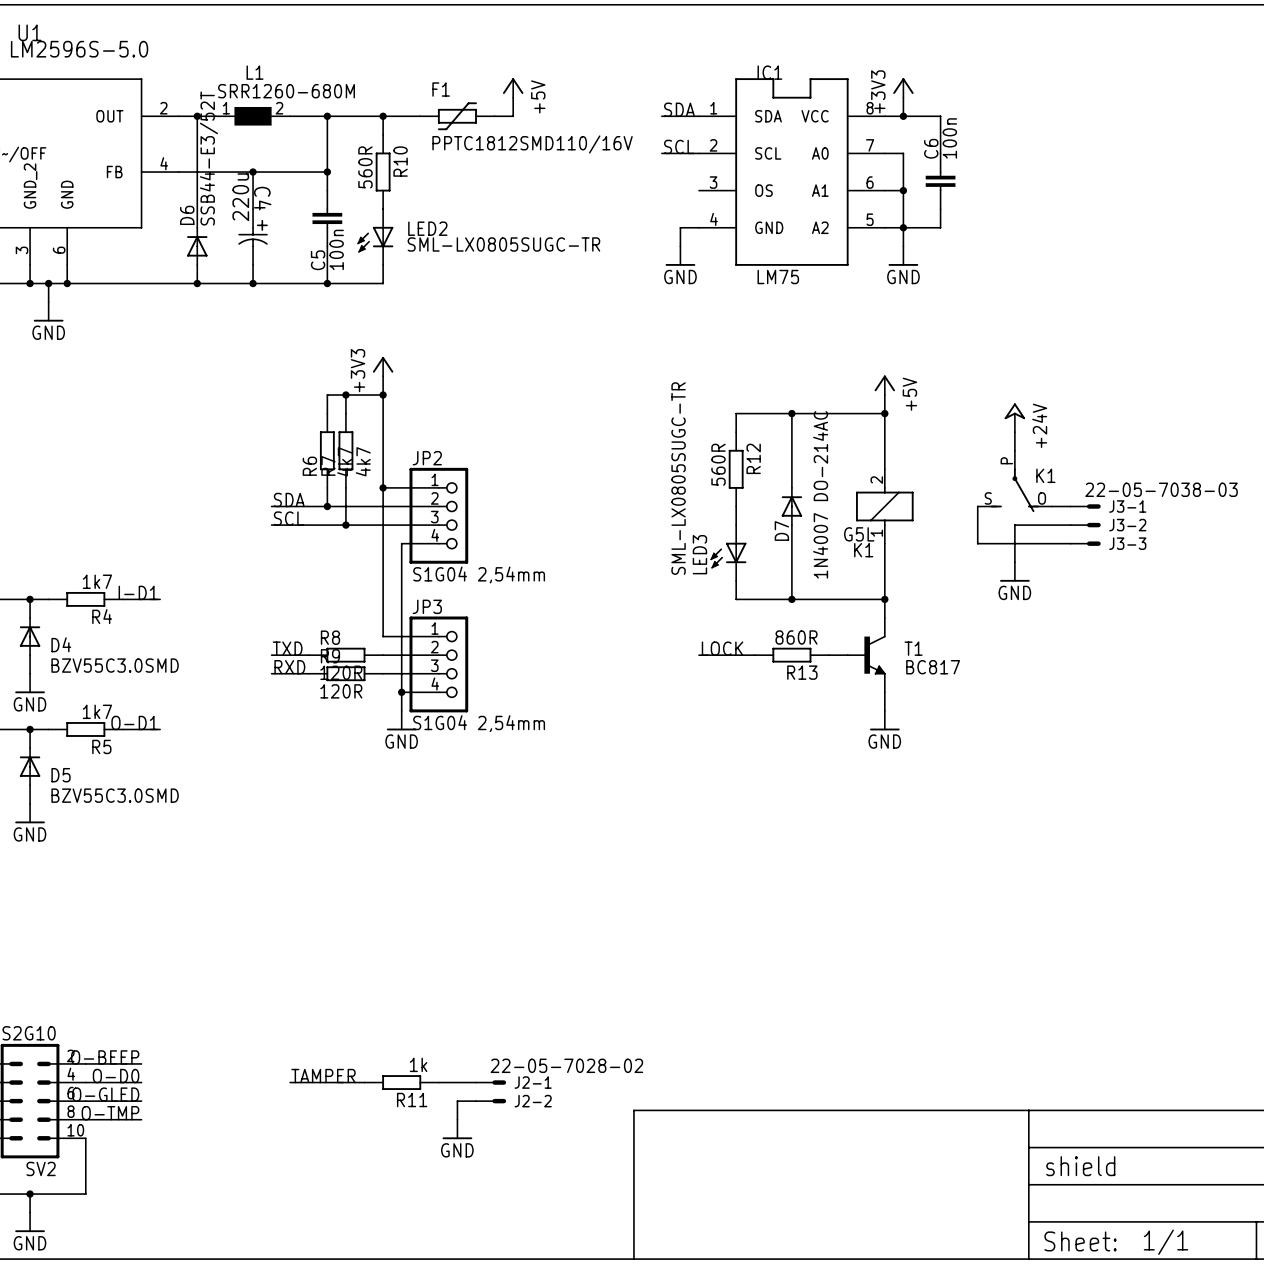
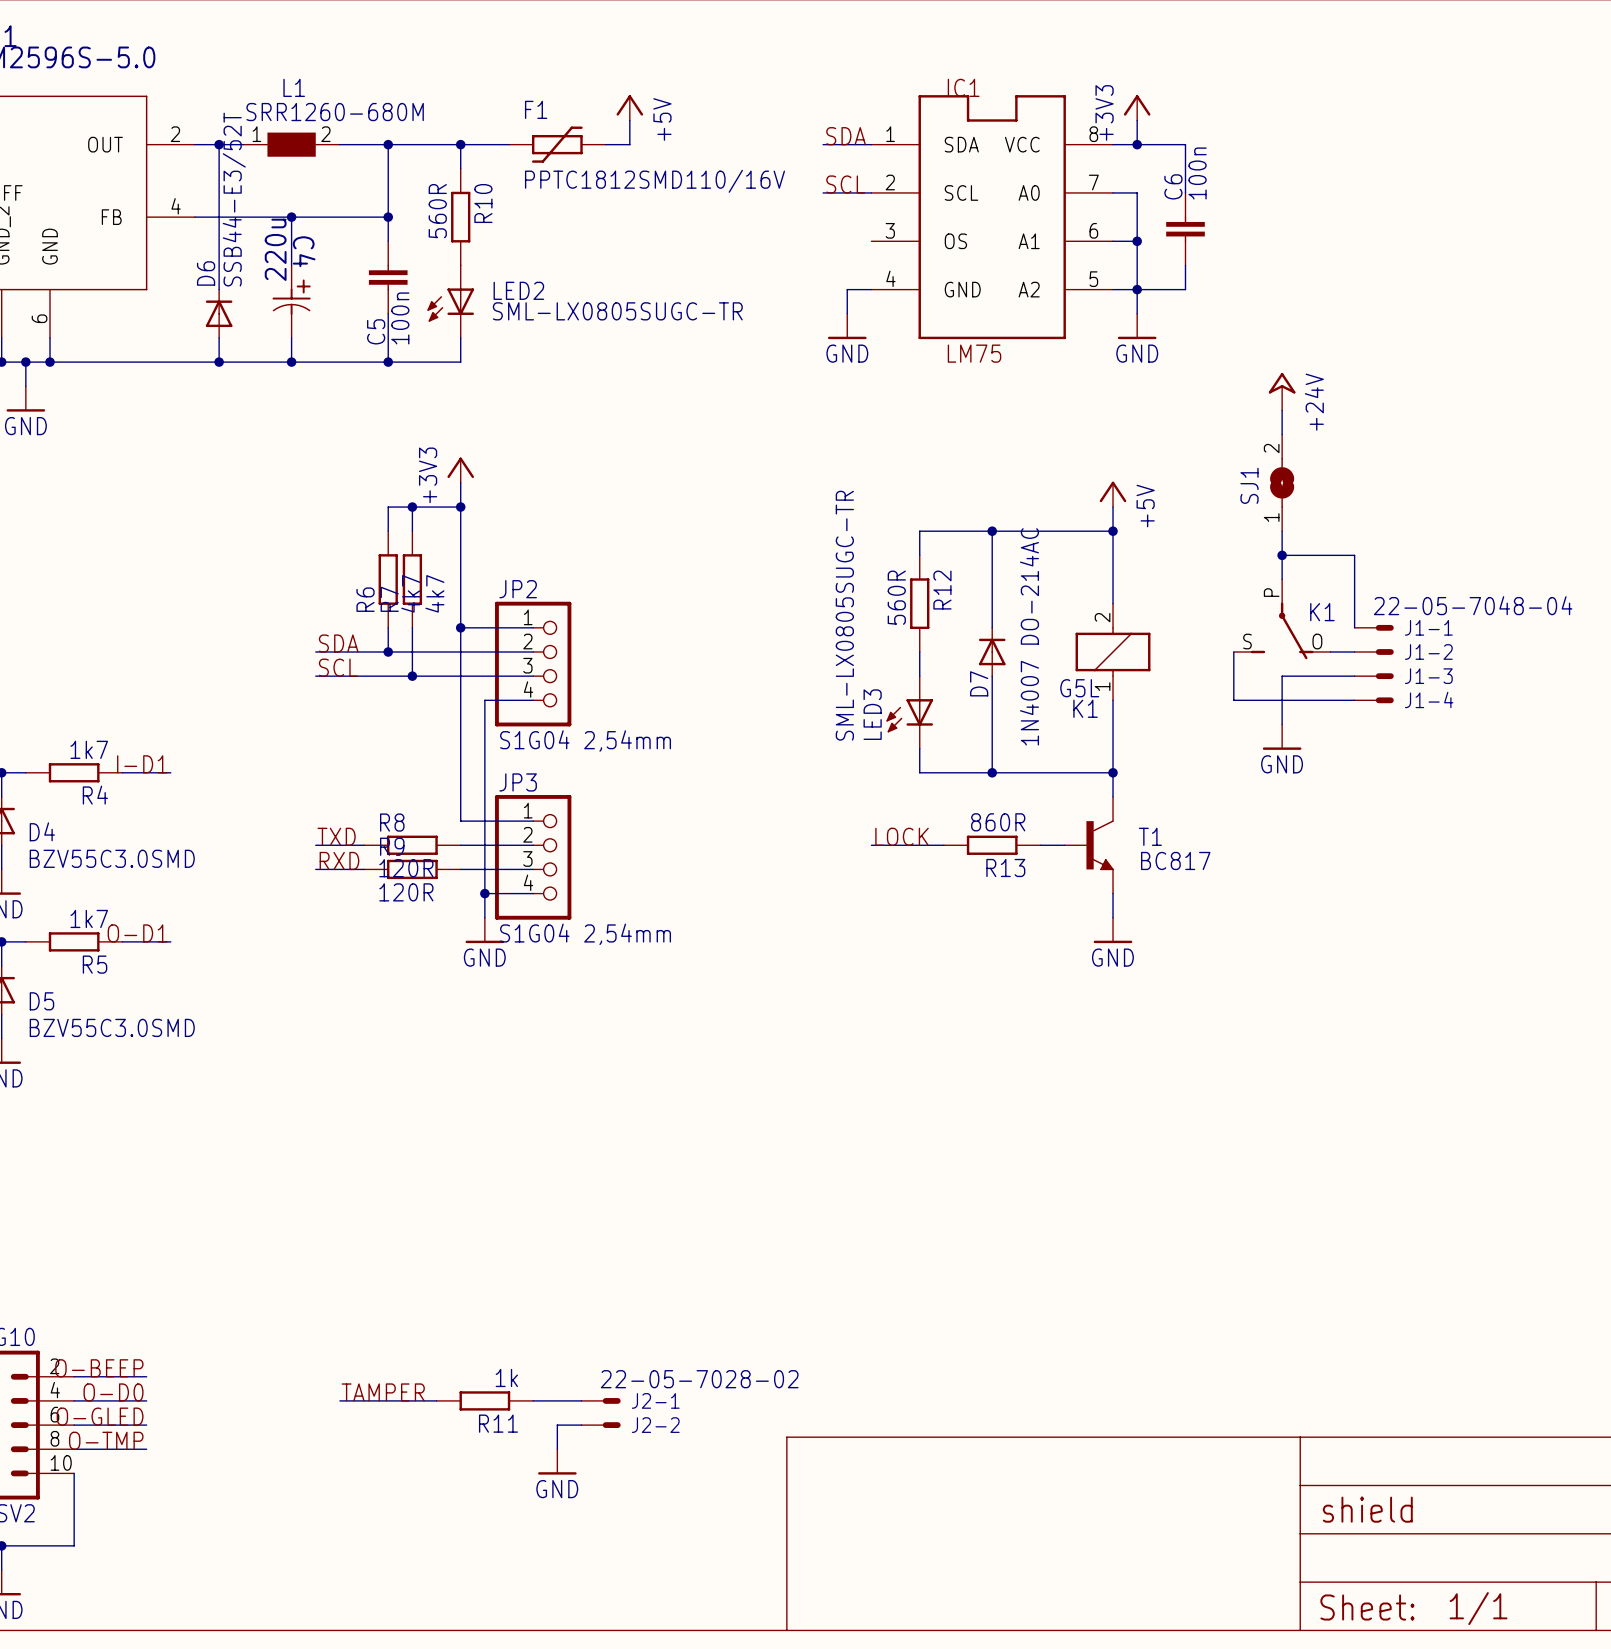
wire: none -> (1282, 410) (1282, 434)
SJ1: none -> (1282, 482)
wire: none -> (1282, 531) (1282, 555) (1354, 555) (1354, 627)
power symbol position: +24V (1014, 417) -> +24V (1282, 391)
junction: none -> (1282, 555)
J1-1: none -> 22-05-7048-04 (1374, 627)
J3-1 value: 22-05-7038-03 (1161, 489) -> none
J3-1 name: J3-1 (1127, 506) -> J1-2 (1428, 651)
J3-2 name: J3-2 (1127, 525) -> J1-3 (1428, 676)
J3-3 name: J3-3 (1127, 543) -> J1-4 (1429, 699)

